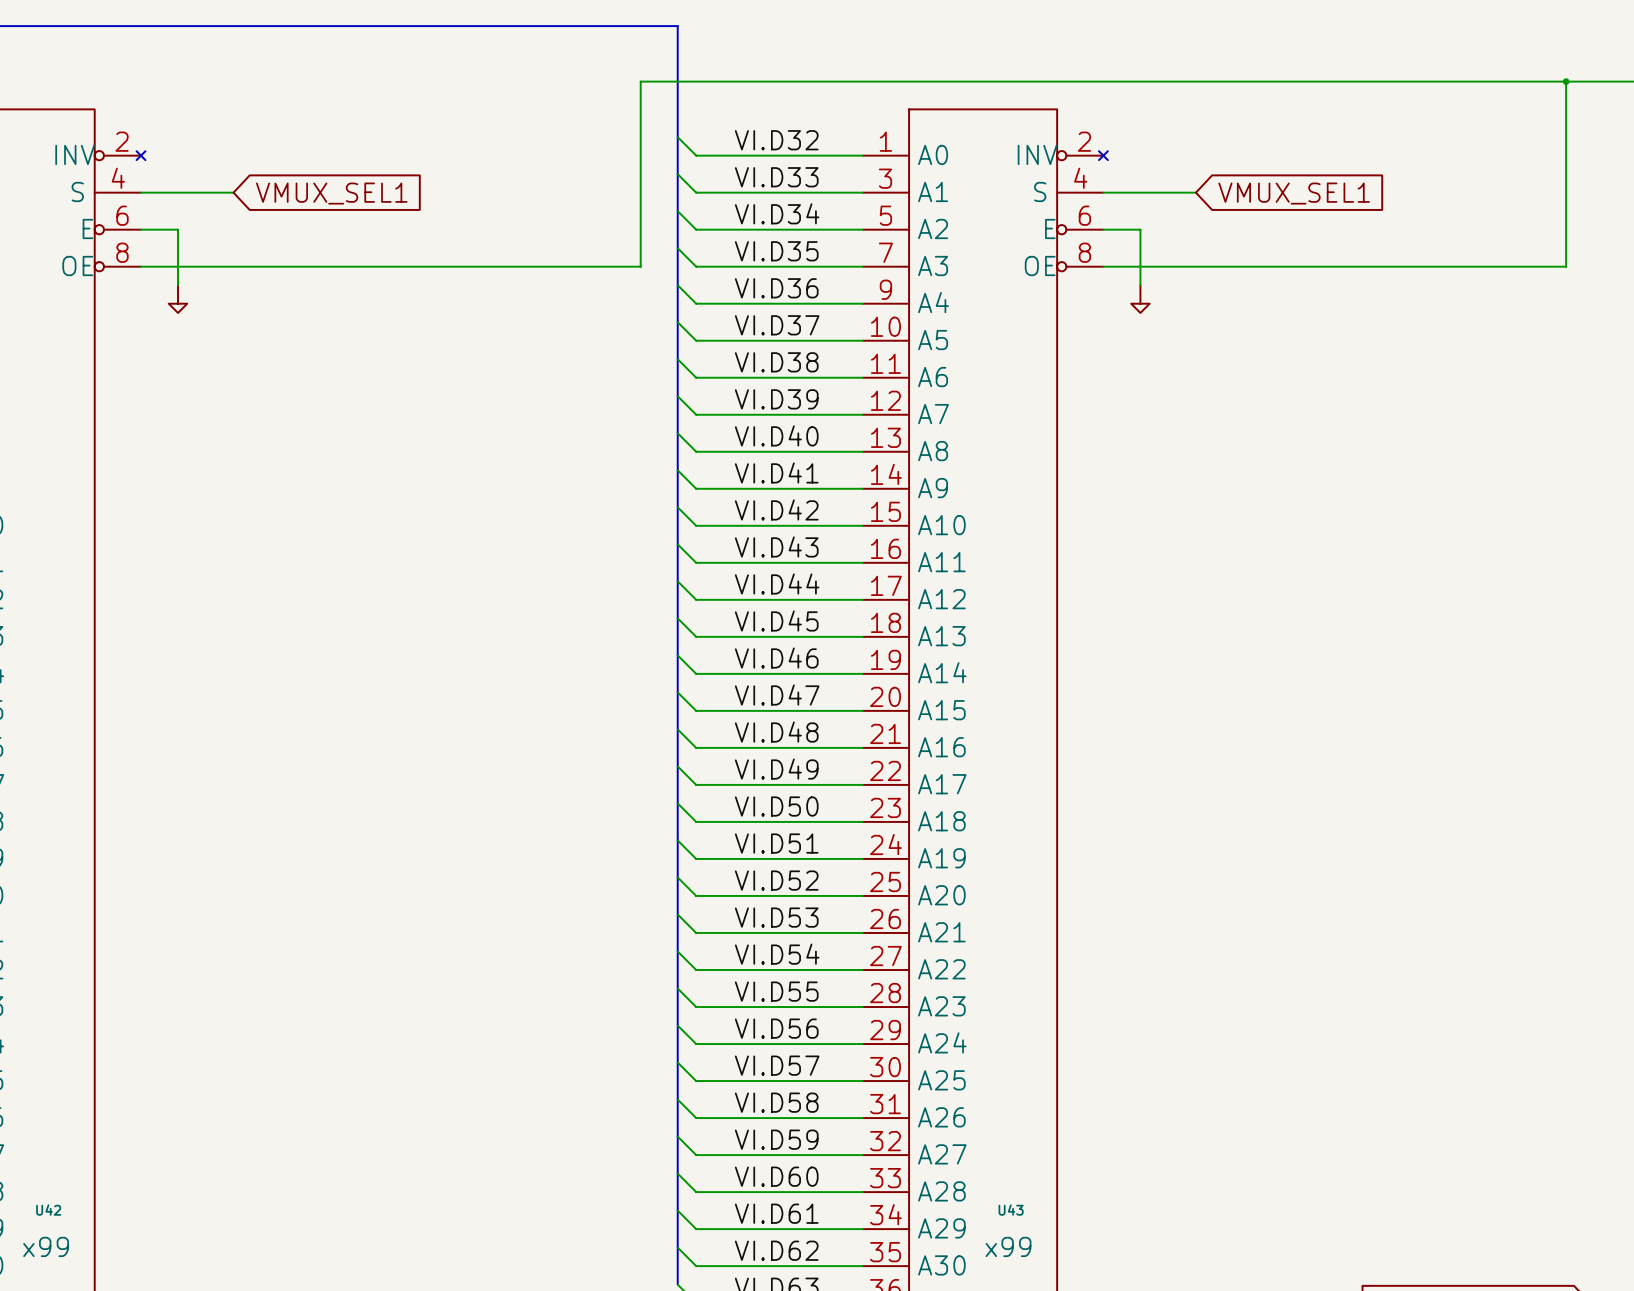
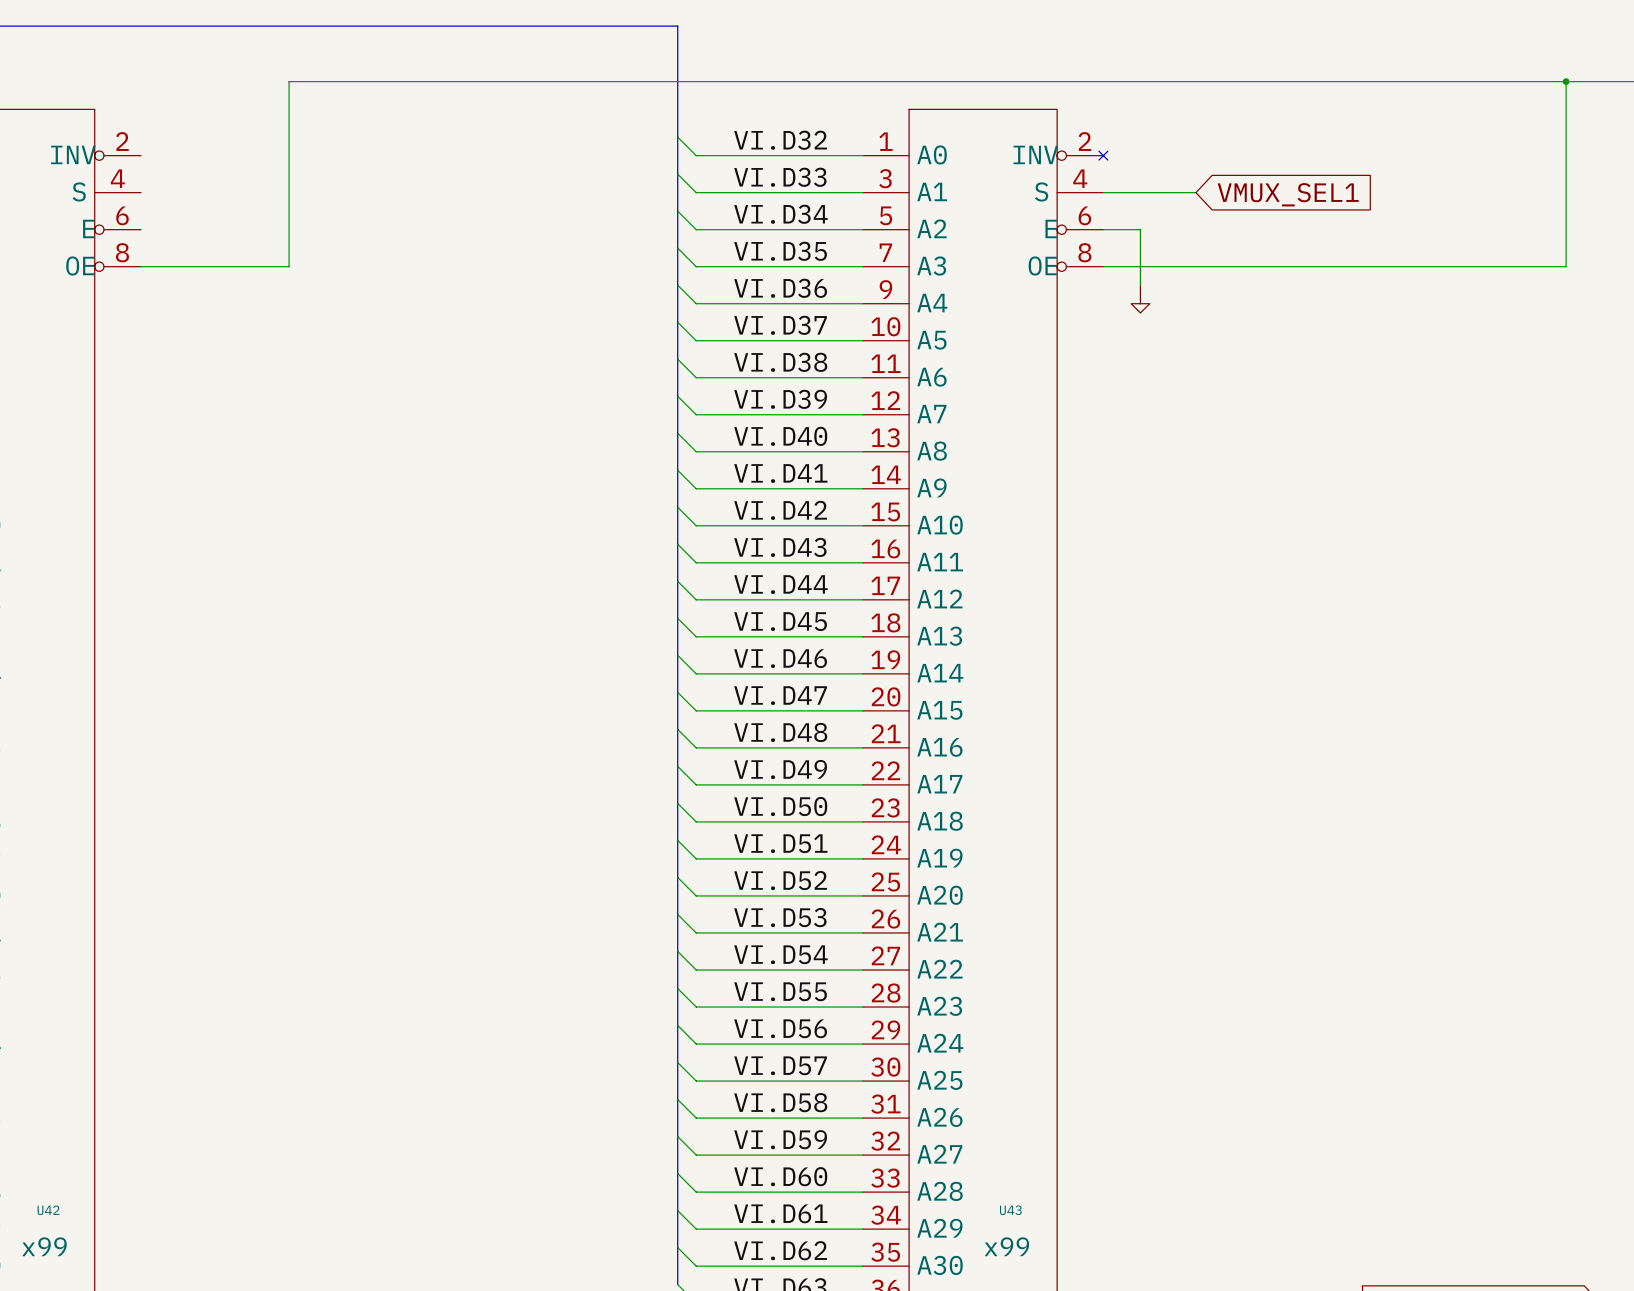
wire: (640, 81) (640, 266) (289, 266) -> (640, 81) (289, 81) (289, 266)
no-connect mark: (140, 155) -> none
wire: (140, 192) (233, 192) -> none
global label: VMUX_SEL1 (331, 193) -> none
wire: (140, 229) (178, 229) (178, 285) -> none
power symbol: (178, 299) -> none

